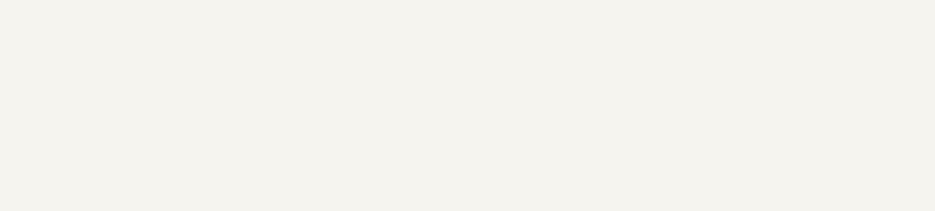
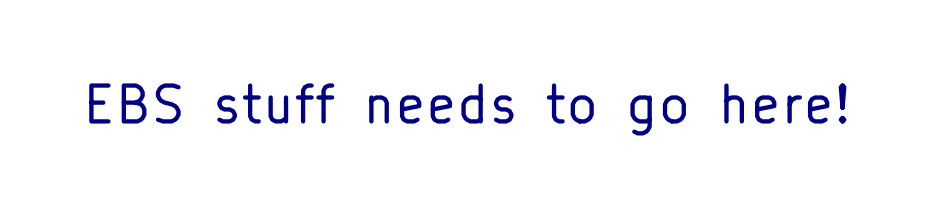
text: none -> EBS stuff needs to go here! (467, 109)

